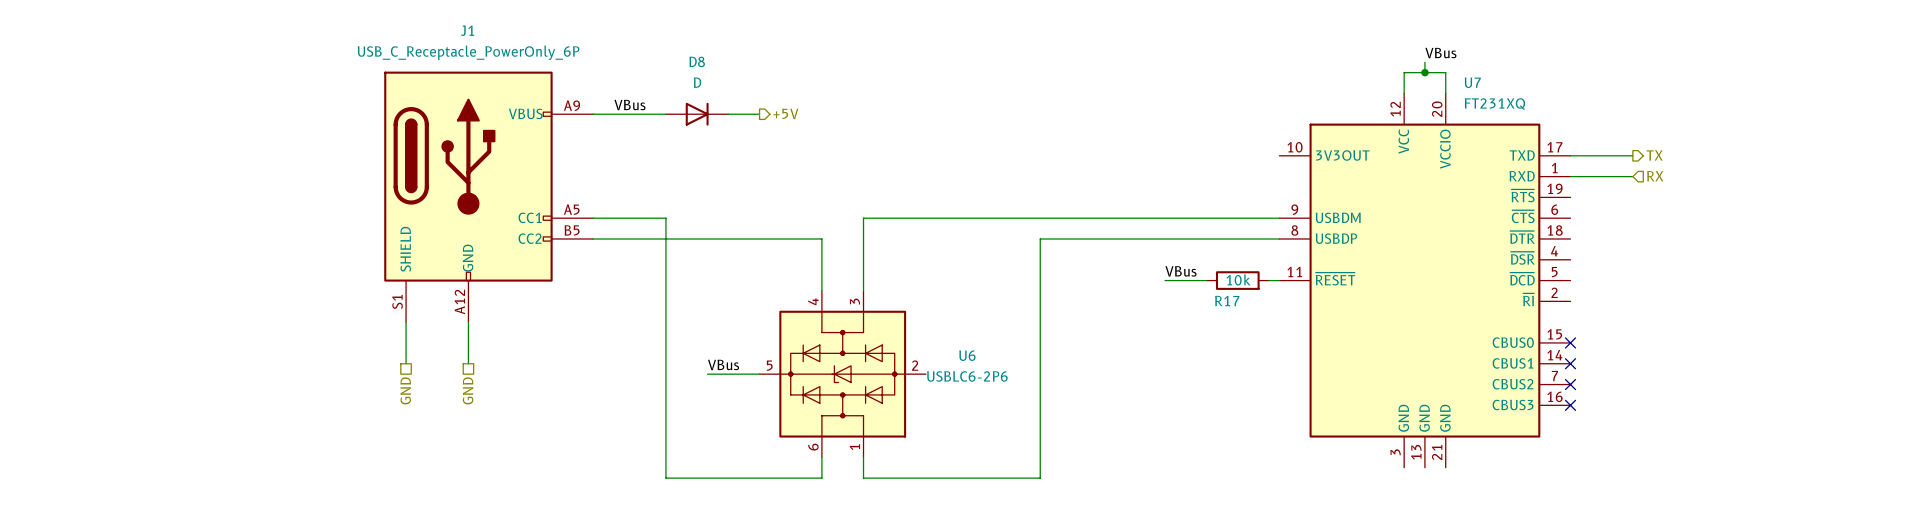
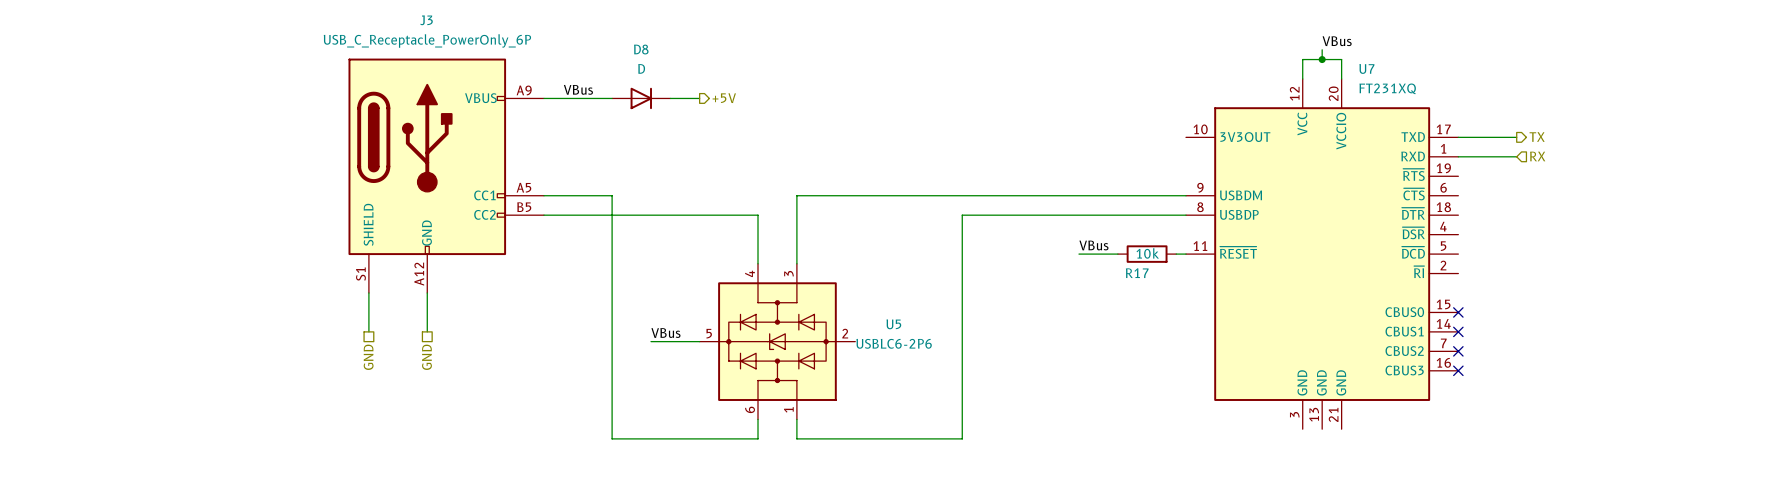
J1 name: J1 (467, 30) -> J3 (426, 20)
U6 name: U6 (967, 355) -> U5 (893, 324)

